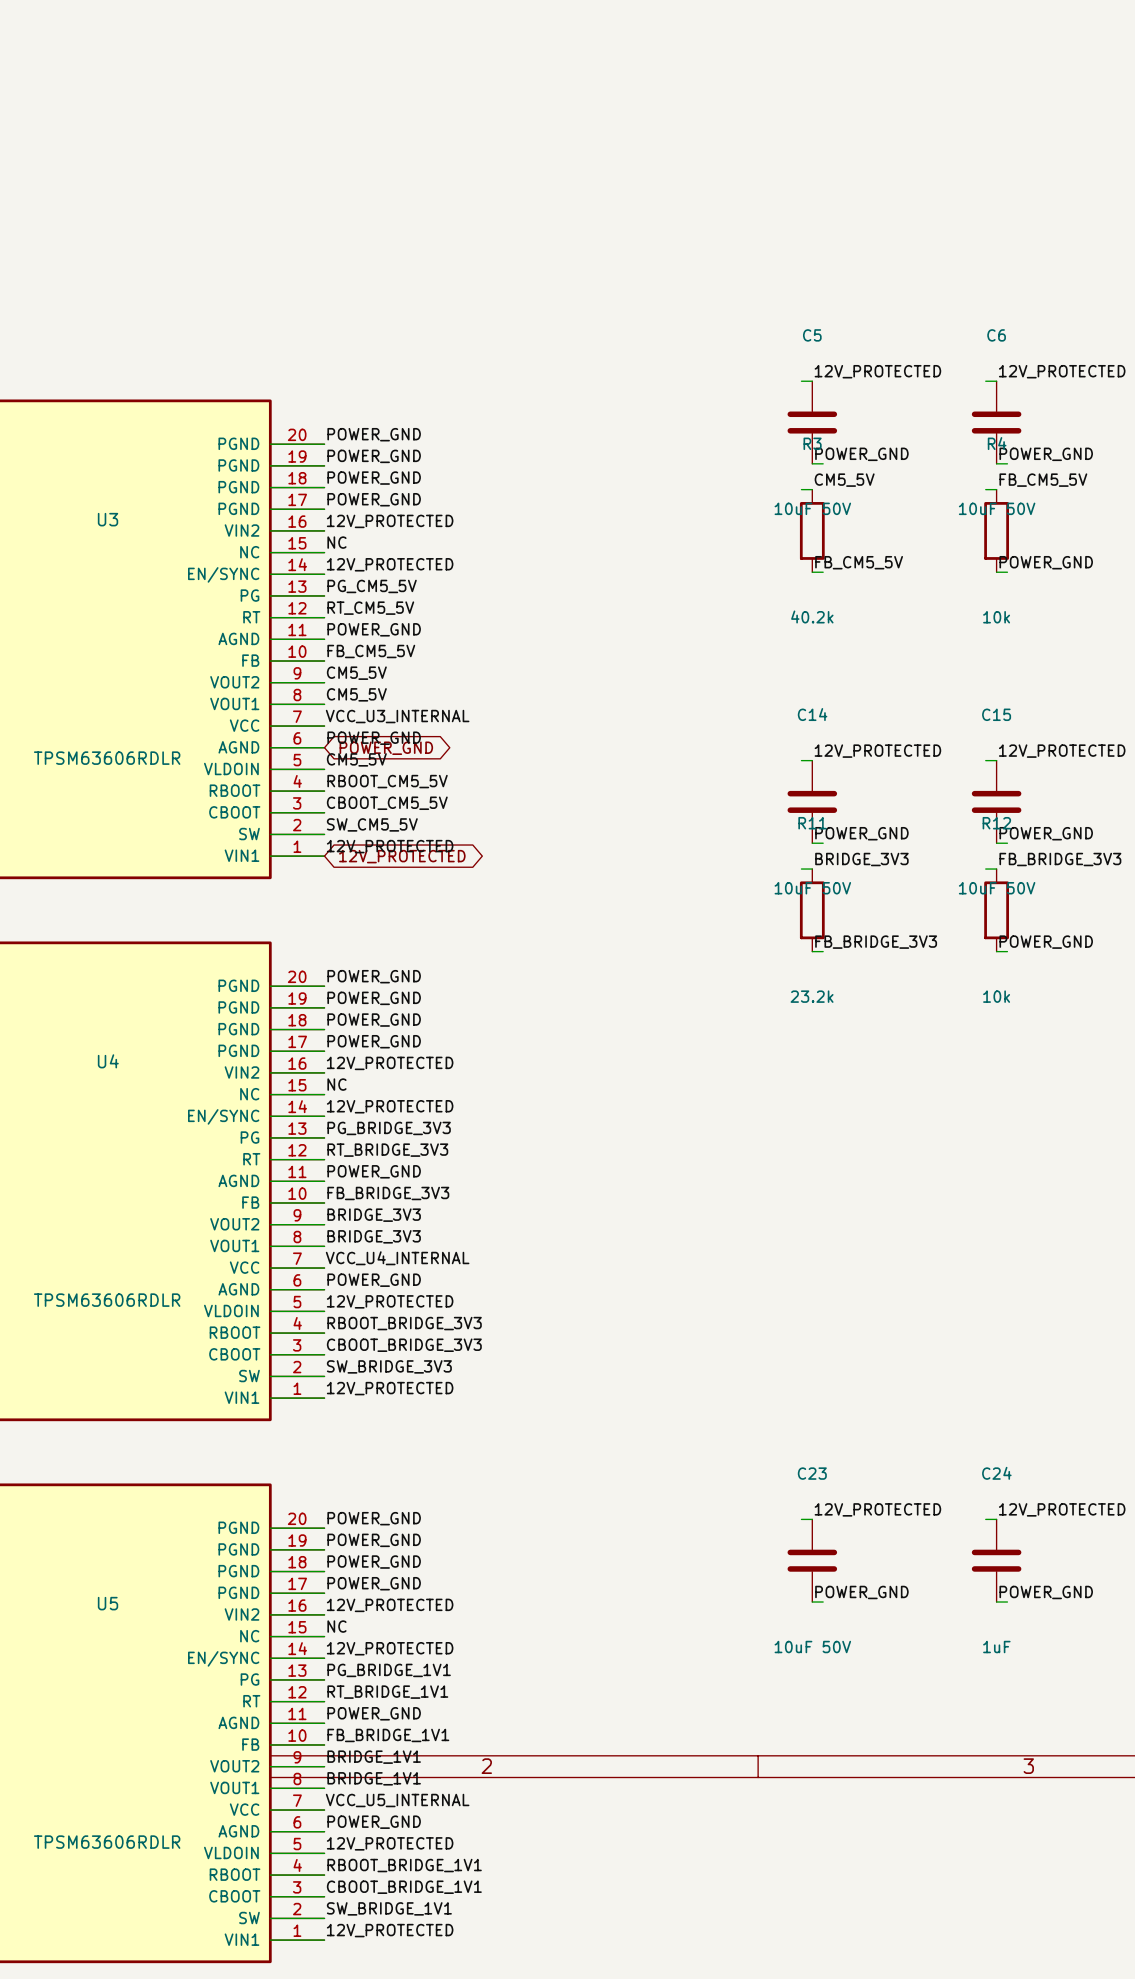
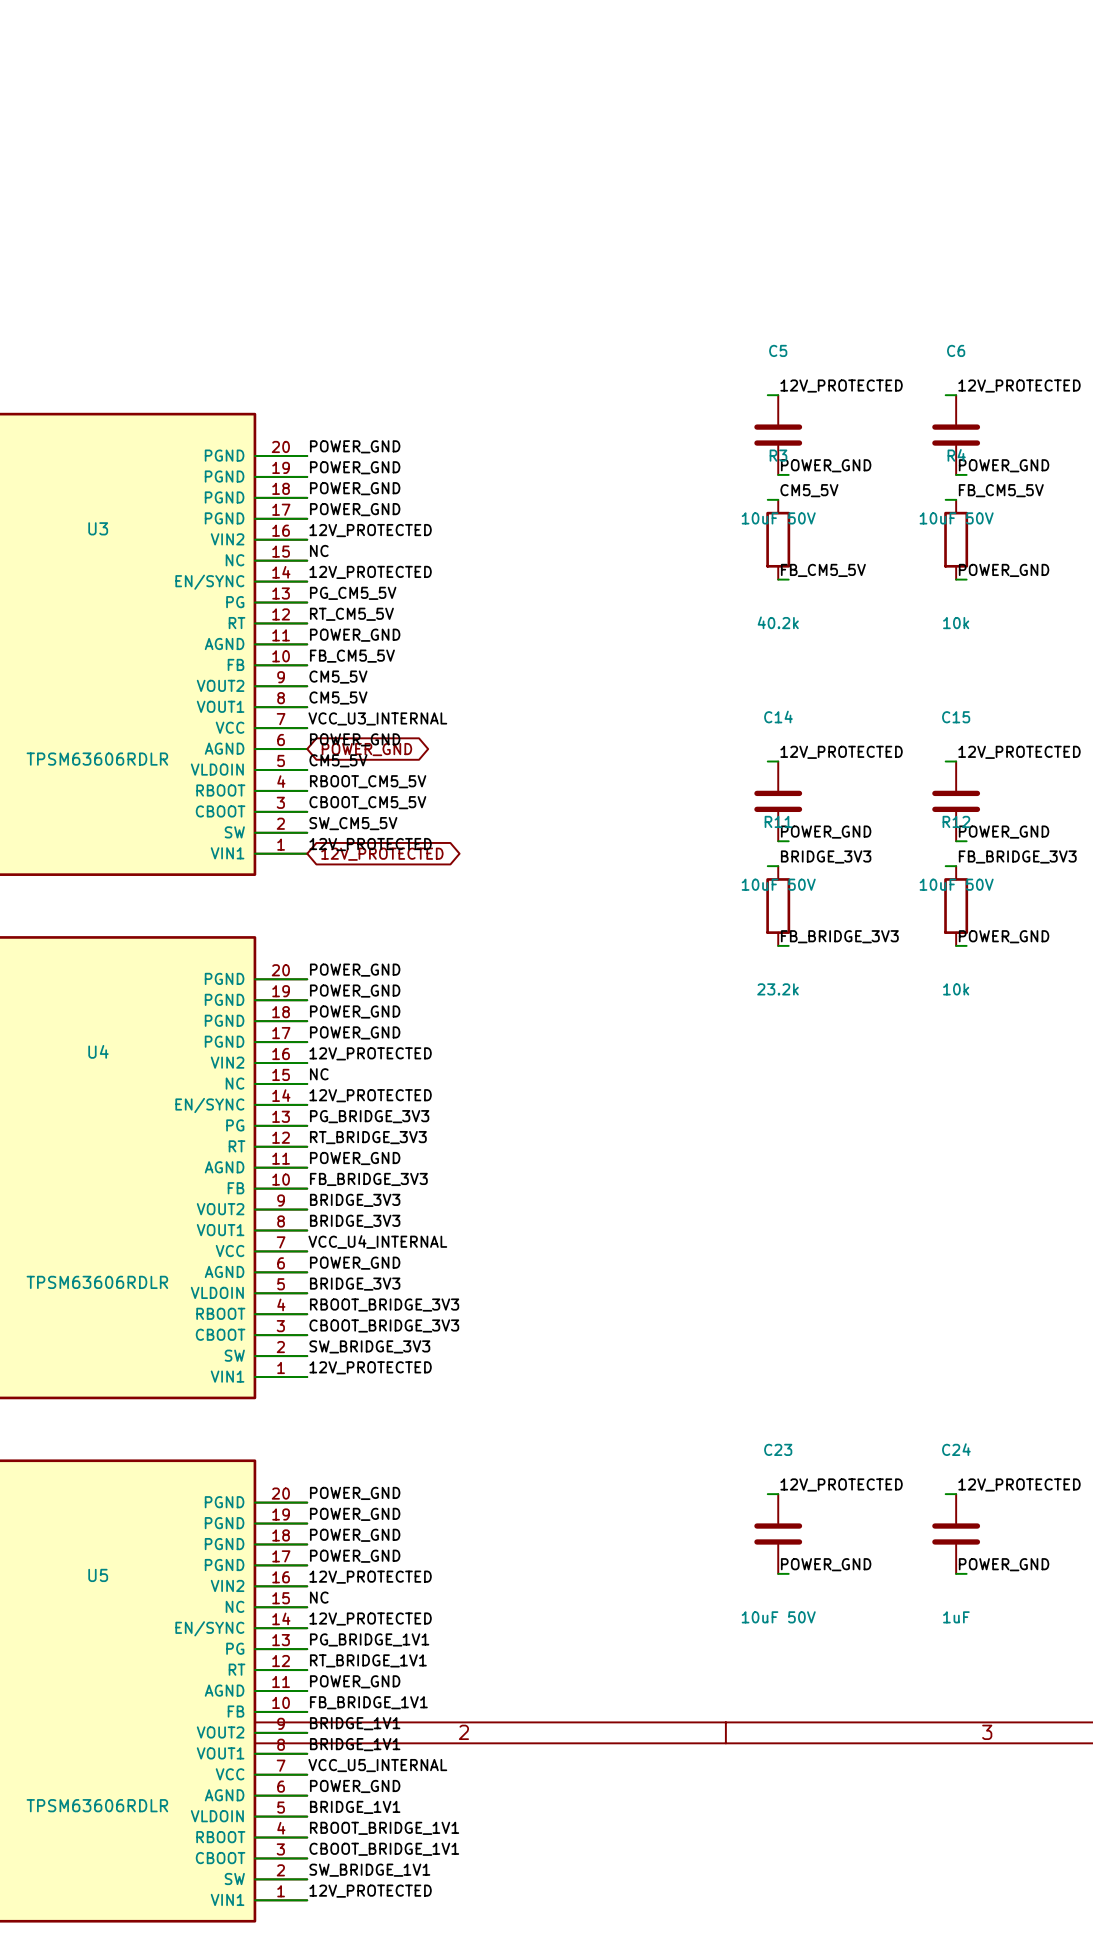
label: 12V_PROTECTED (390, 1301) -> BRIDGE_3V3 (355, 1284)
label: 12V_PROTECTED (390, 1843) -> BRIDGE_1V1 (355, 1807)

